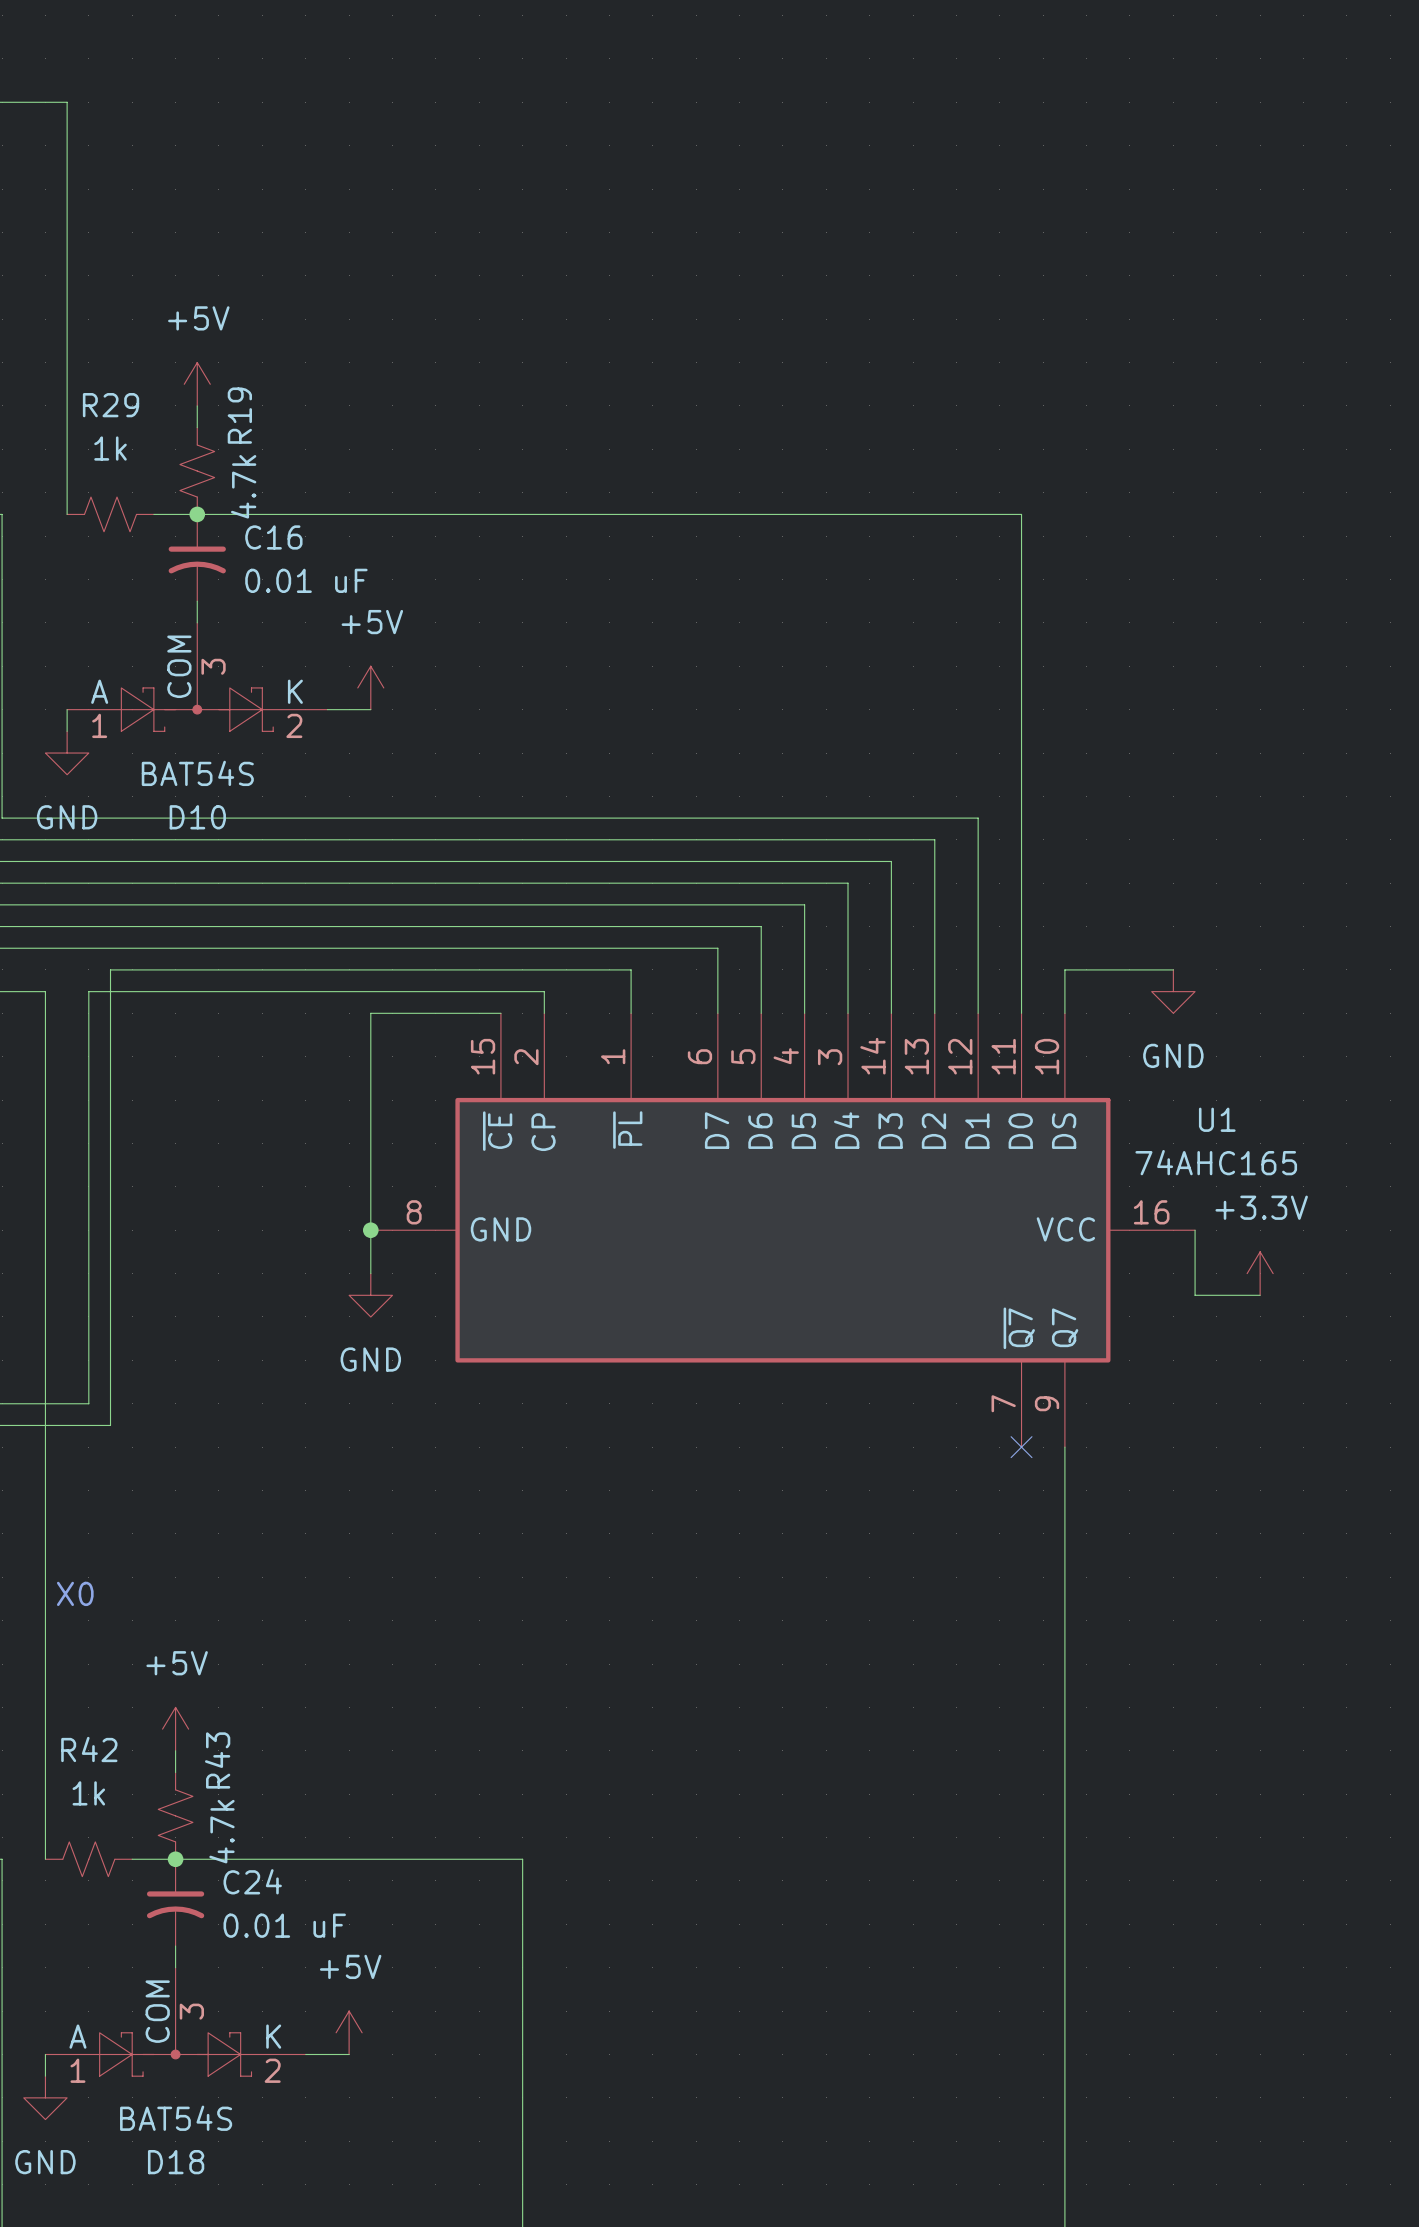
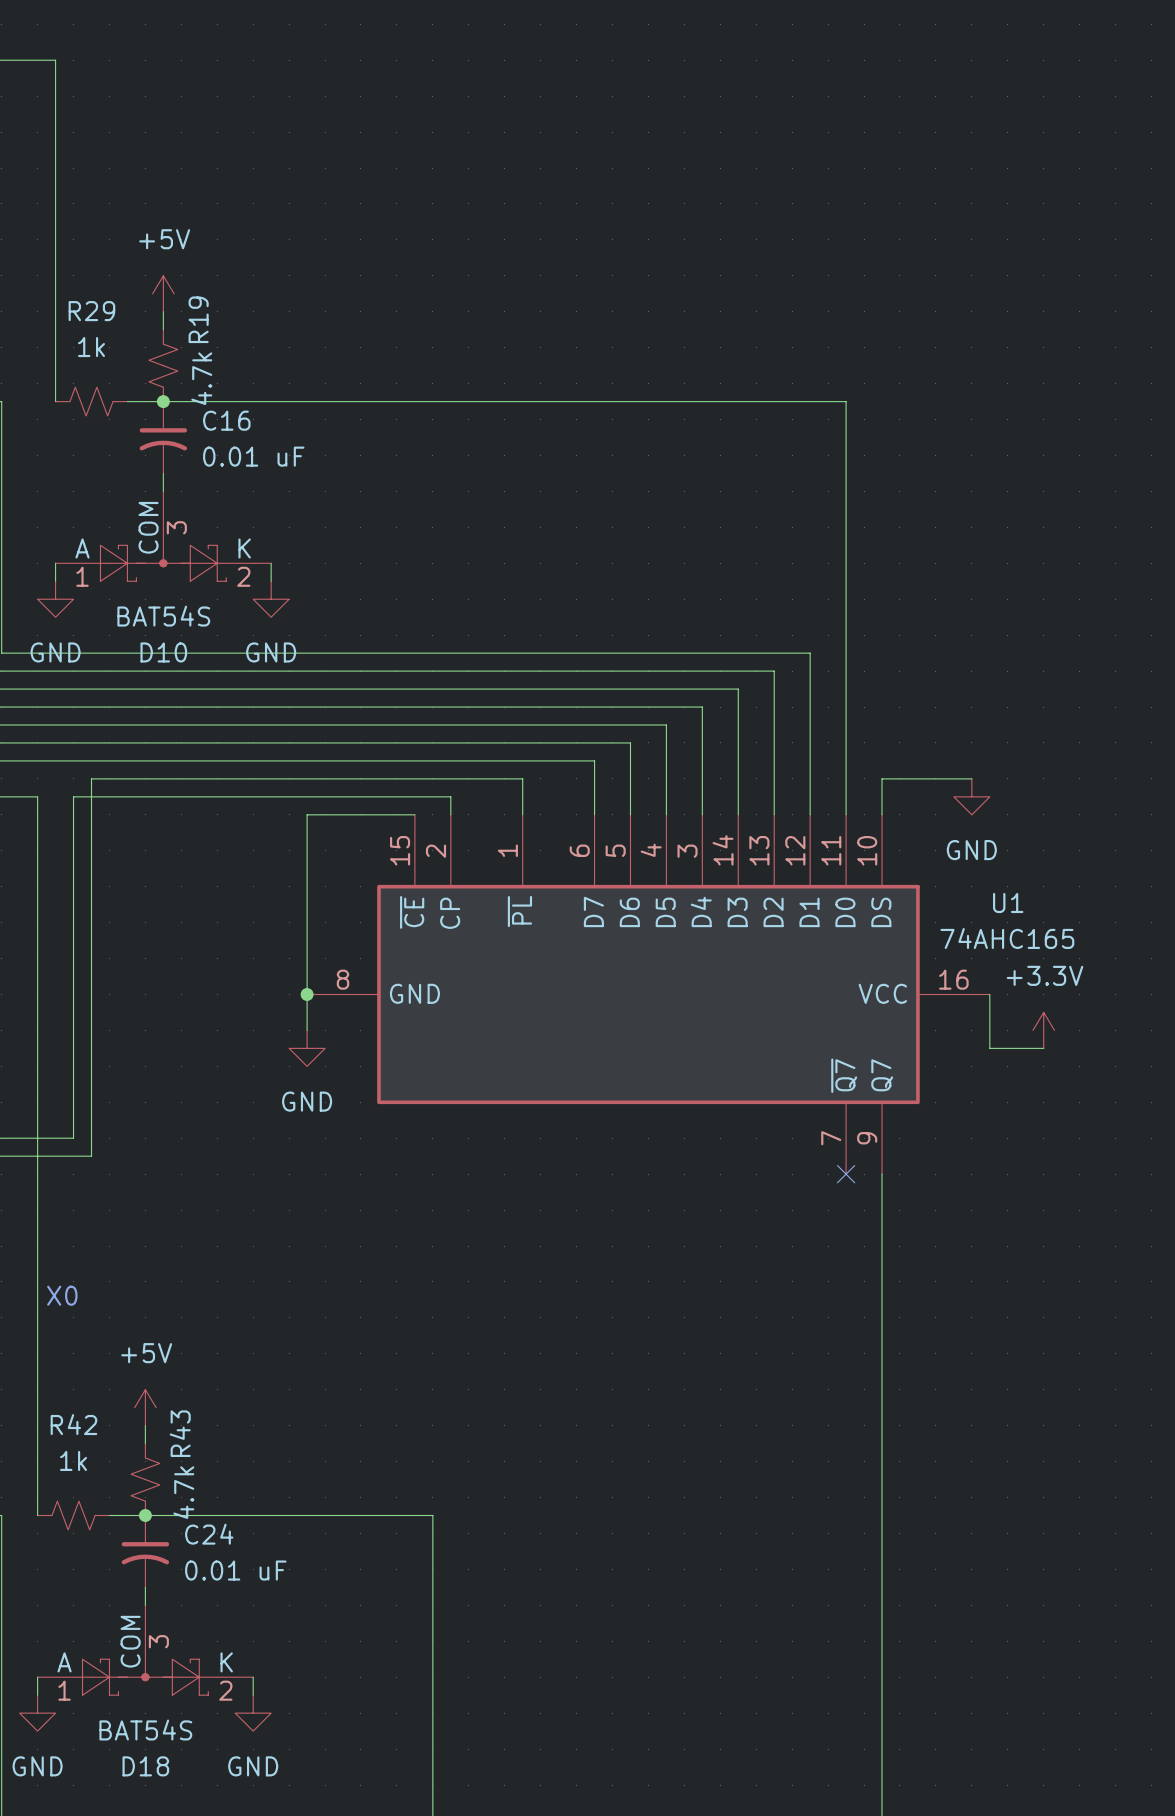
power symbol: +5V (370, 687) -> none
wire: (327, 709) (370, 709) -> (271, 563) (271, 581)
power symbol: none -> GND (271, 599)
power symbol: +5V (349, 2032) -> none
wire: (305, 2054) (349, 2054) -> (253, 1677) (253, 1695)
power symbol: none -> GND (253, 1713)

